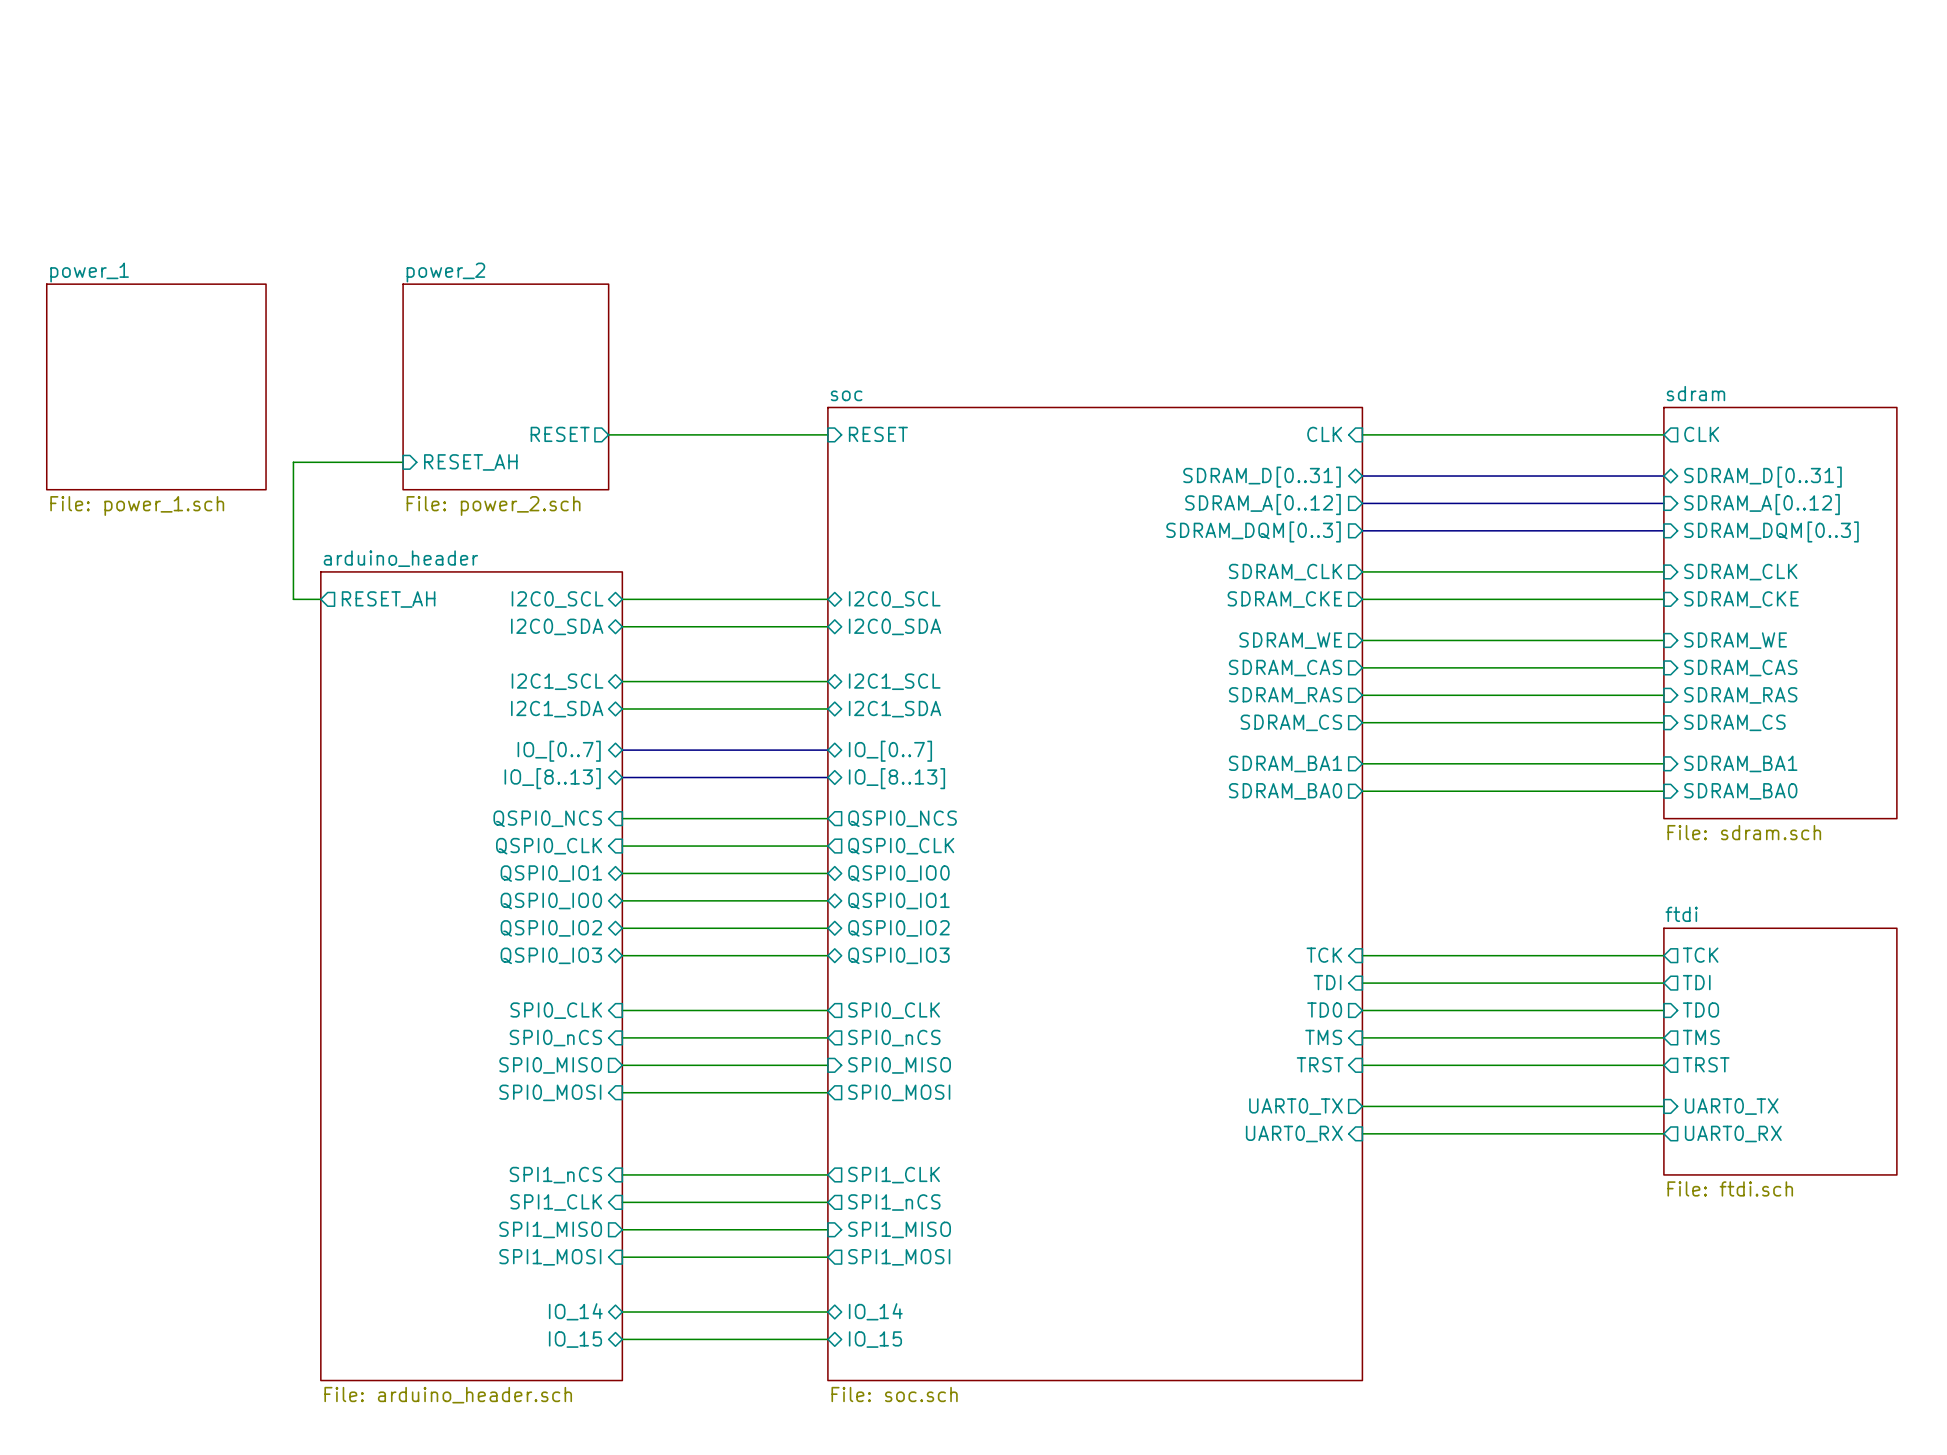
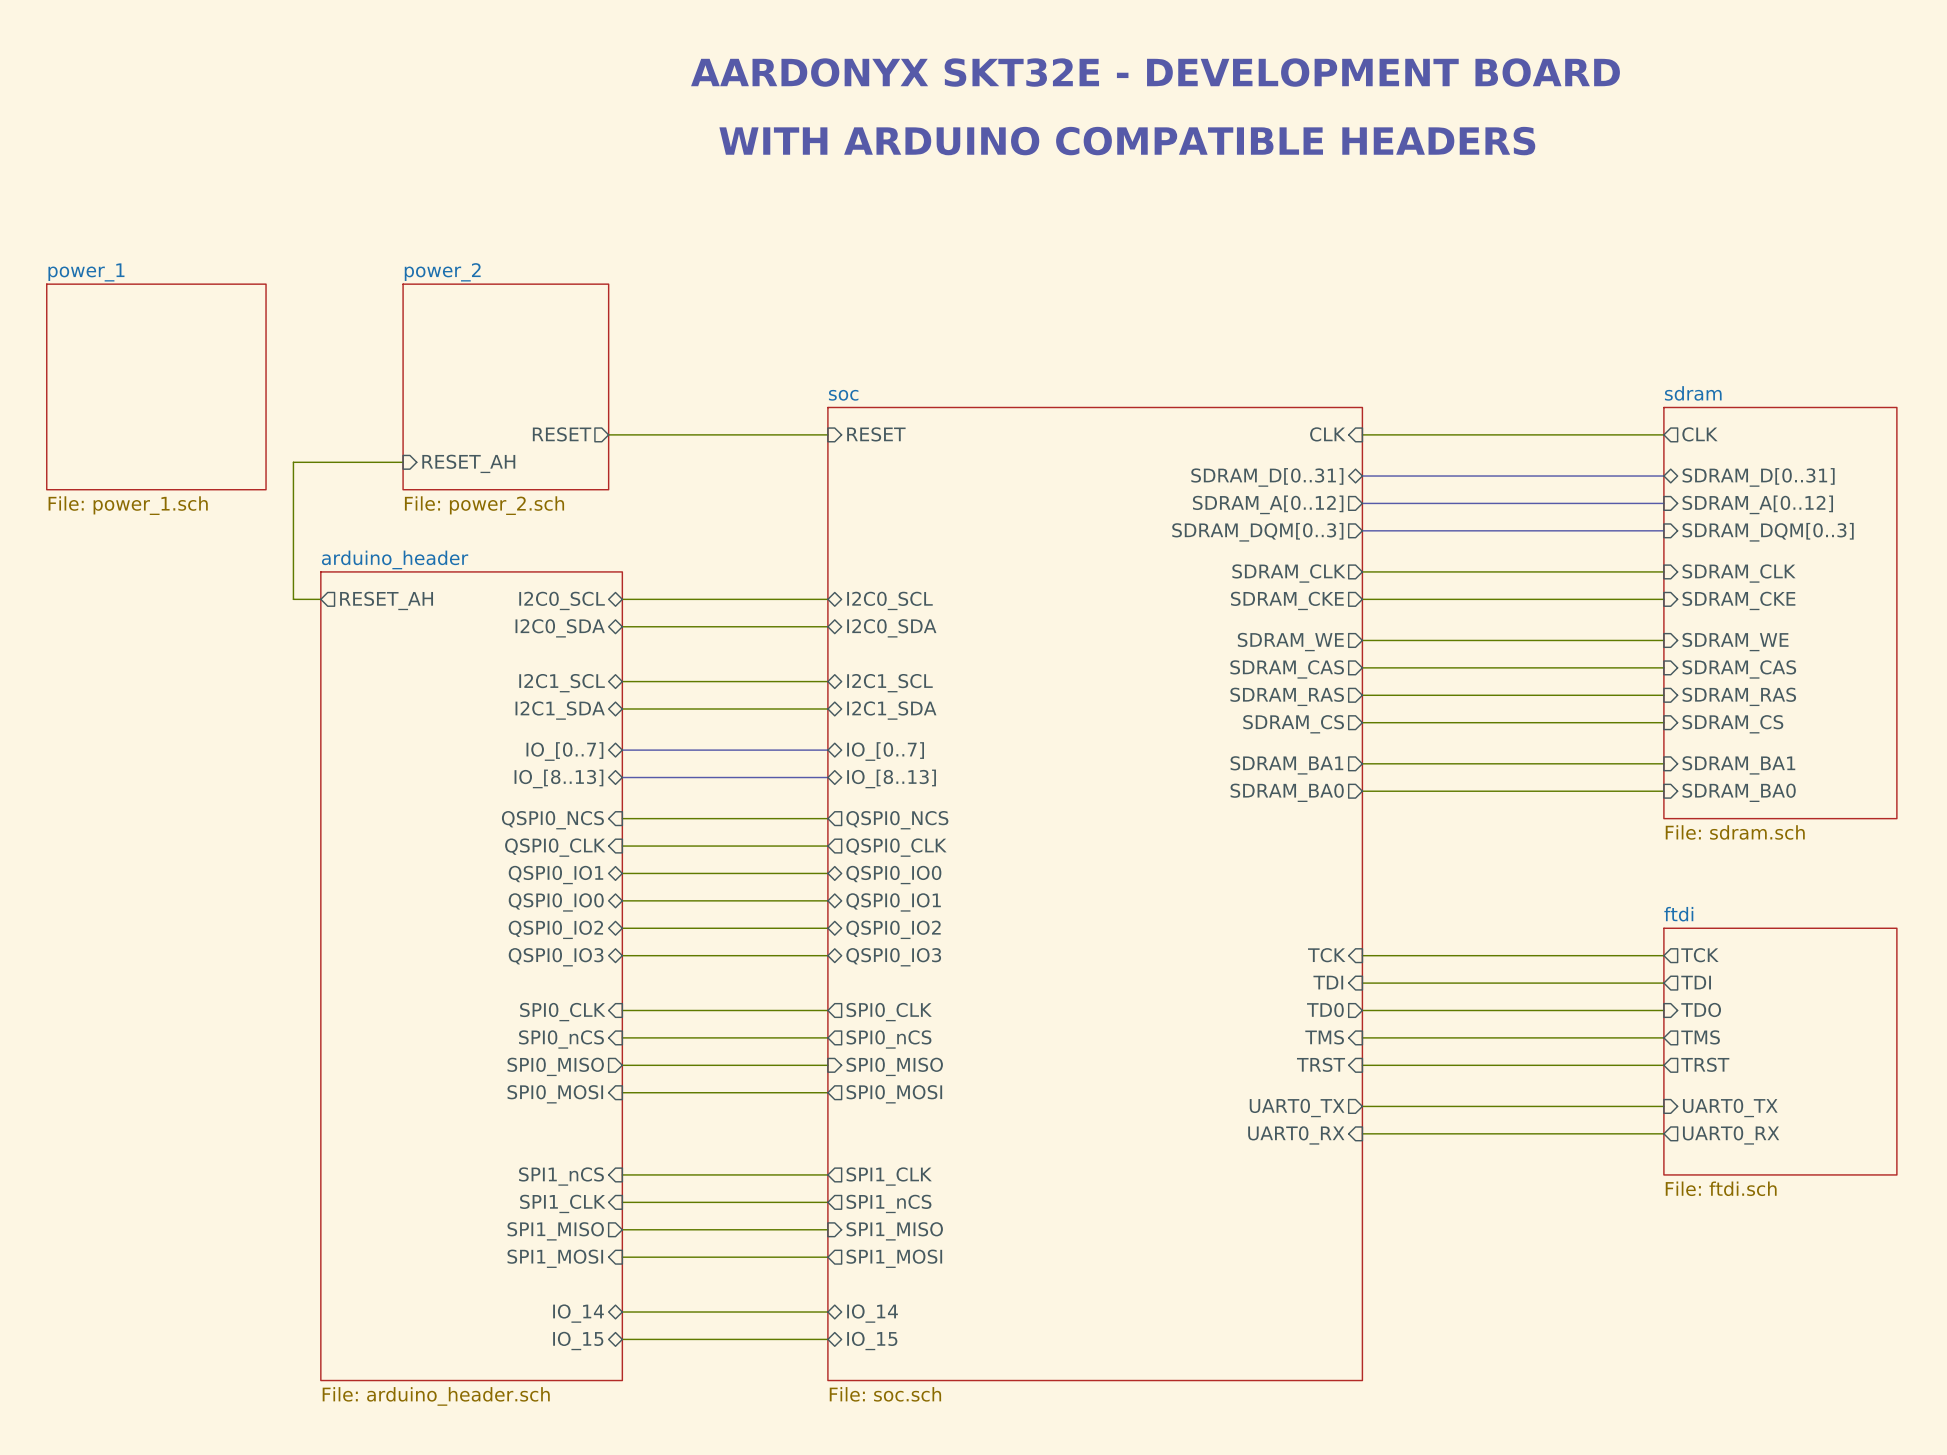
text: none -> AARDONYX SKT32E - DEVELOPMENT BOARD (1155, 72)
text: none -> WITH ARDUINO COMPATIBLE HEADERS (1127, 141)

